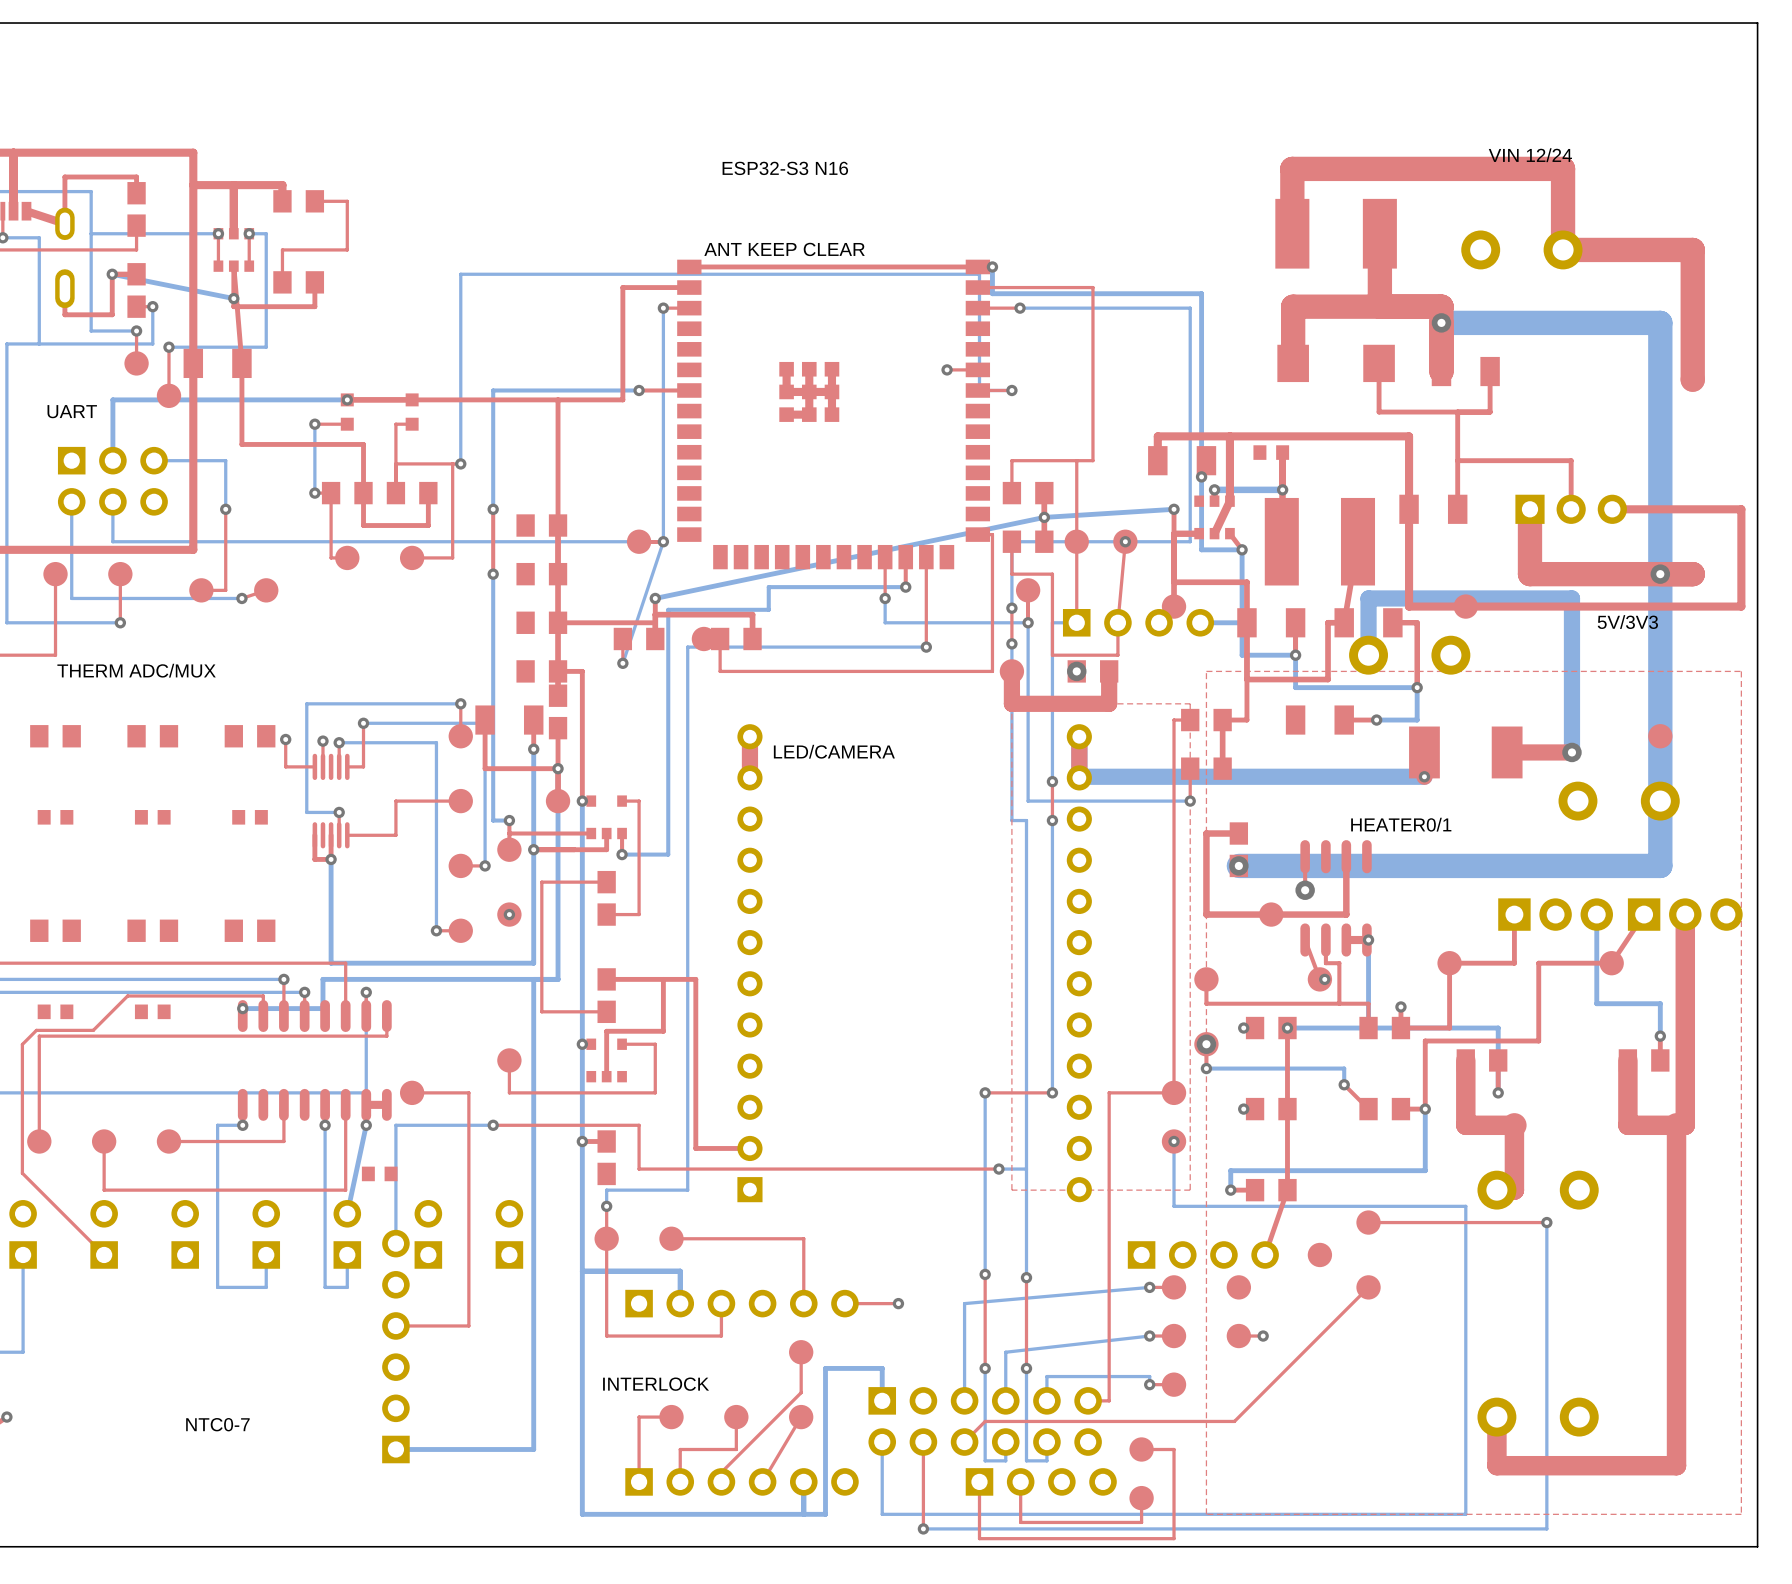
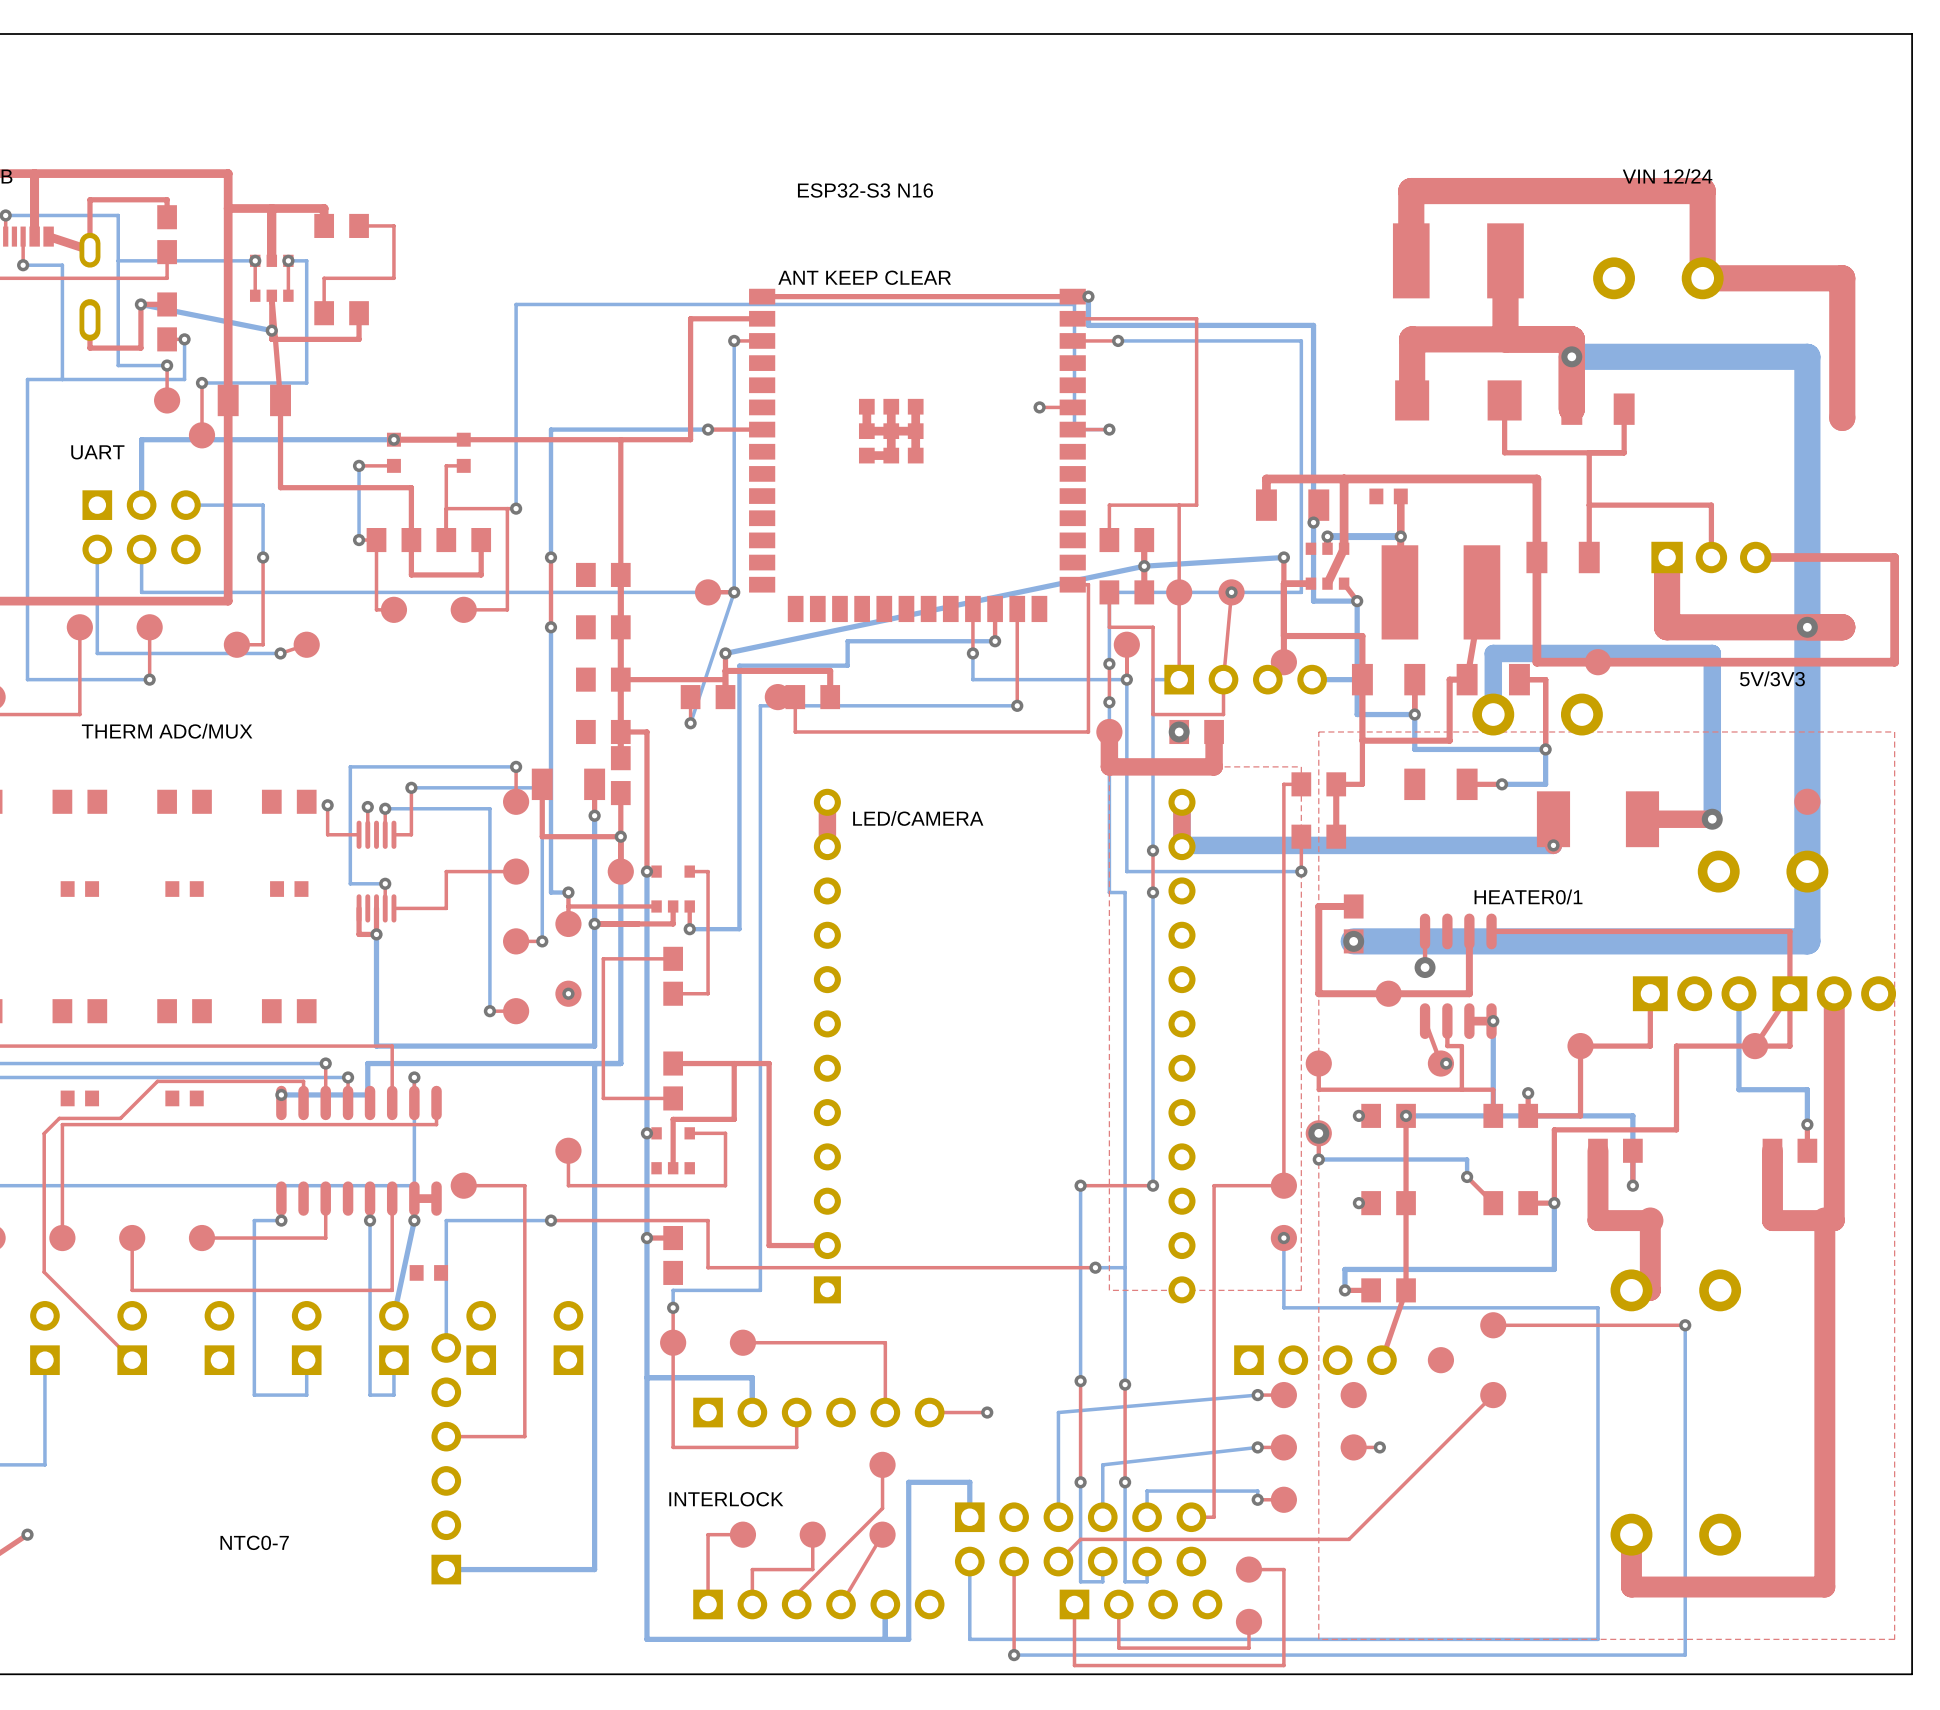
top track: none -> (1491, 931) (1789, 931) (1789, 1046) (1755, 1046)

